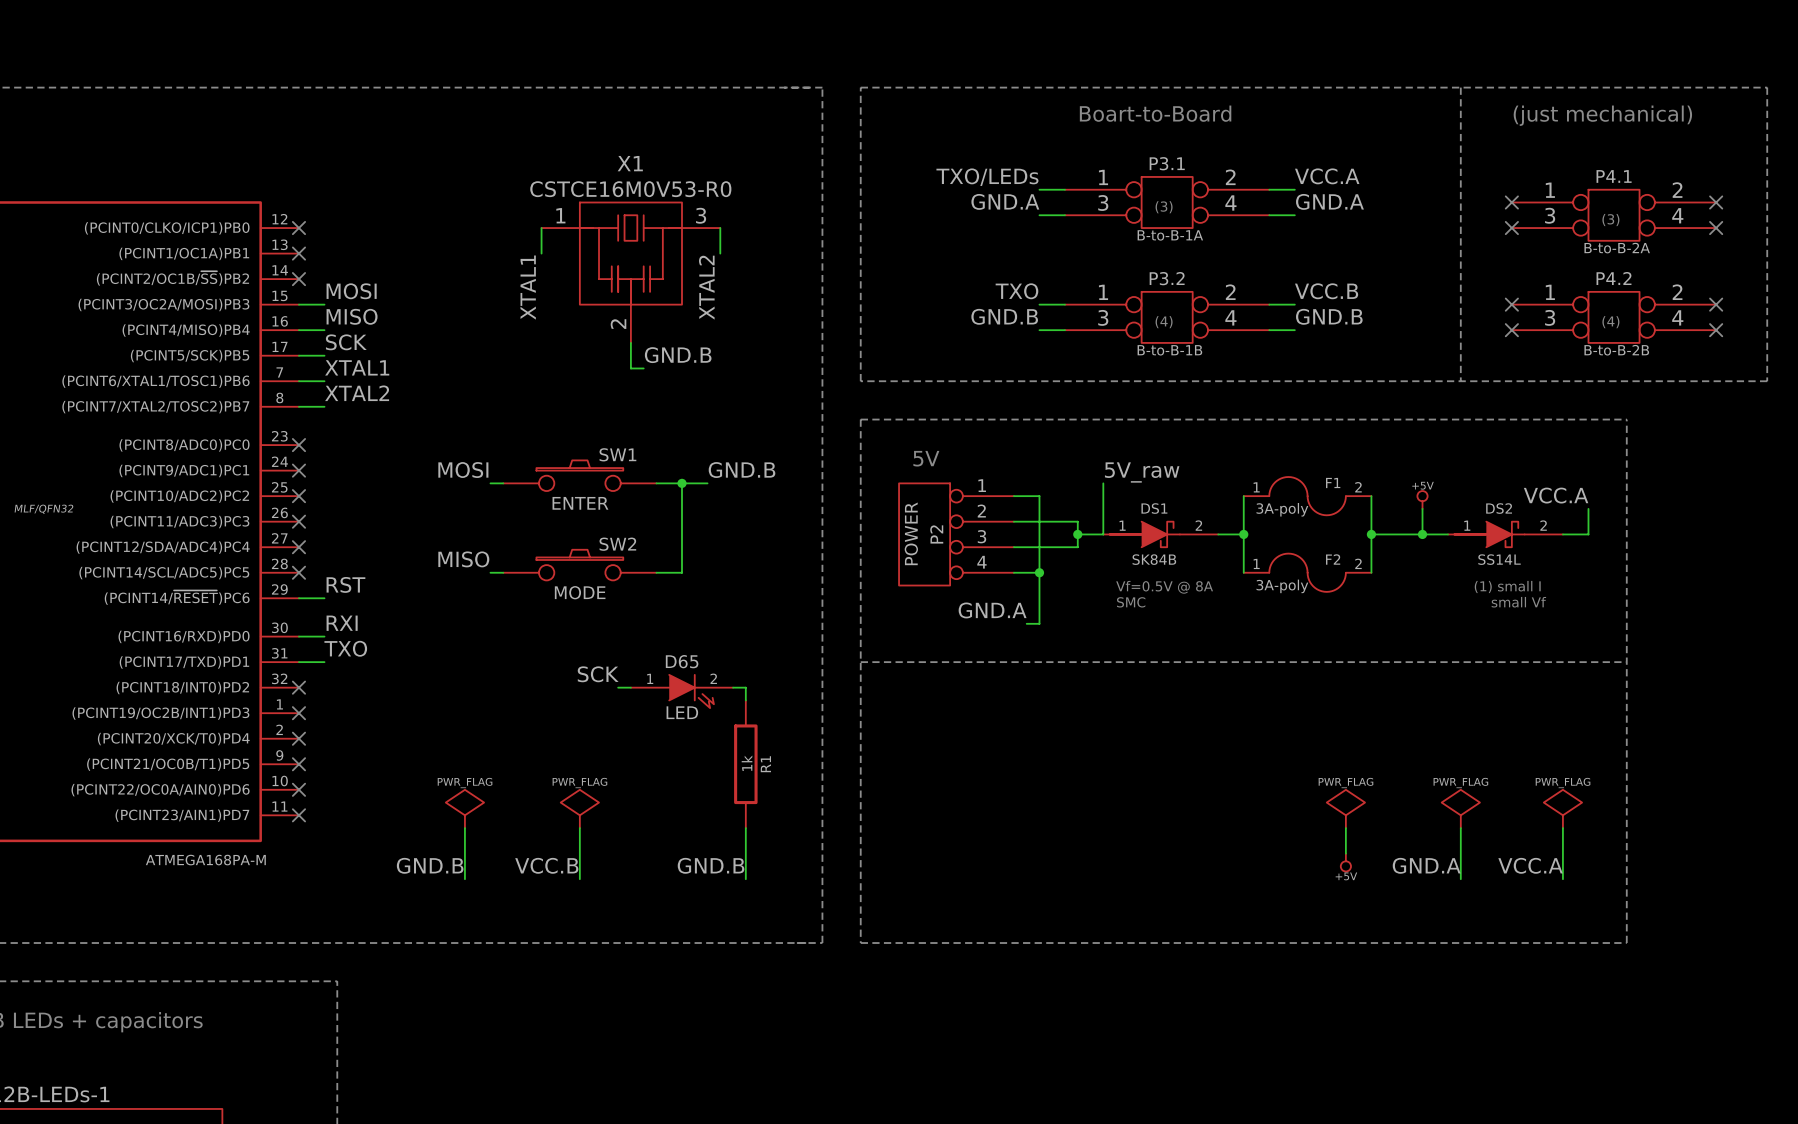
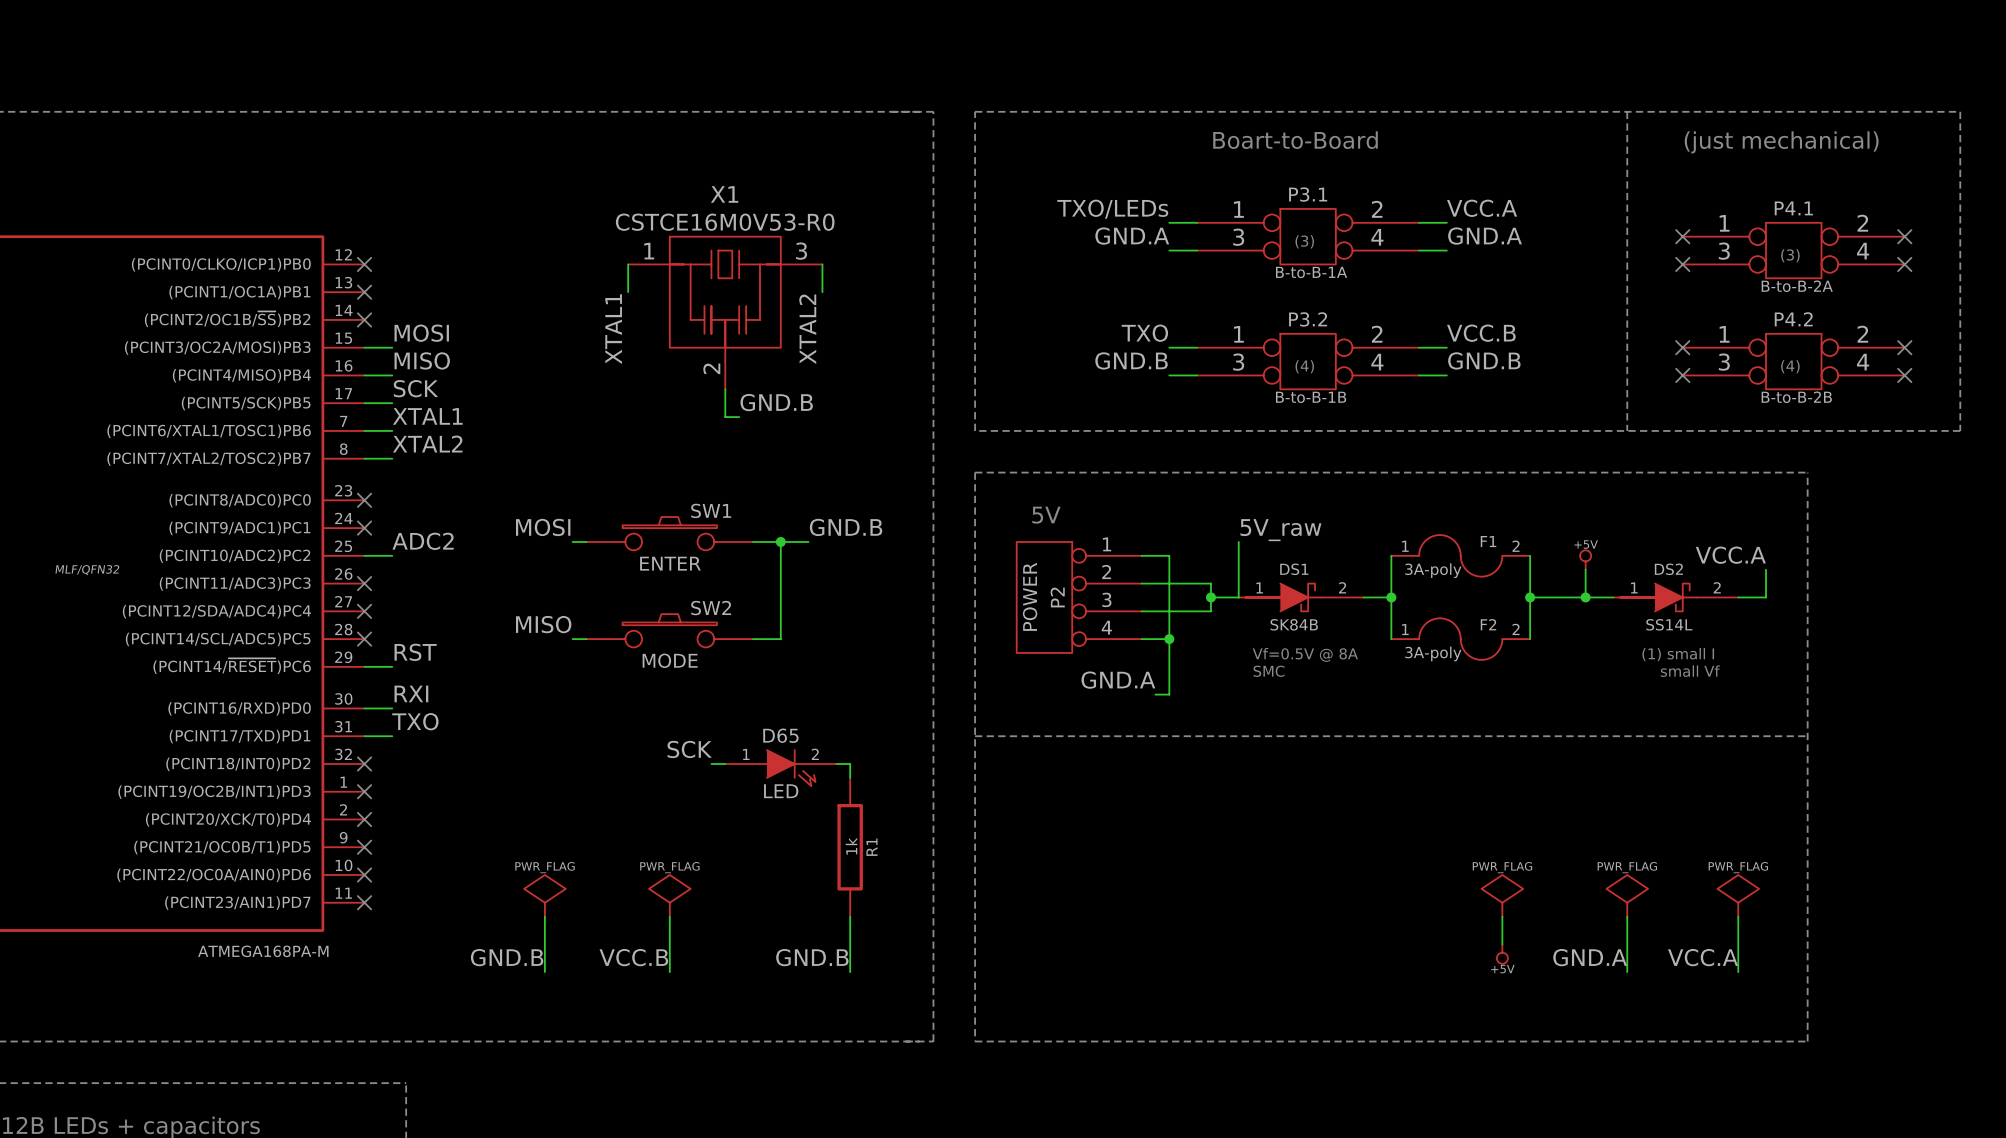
label: none -> ADC2 (423, 541)
wire: none -> (364, 555) (392, 555)
no-connect mark: (298, 496) -> none

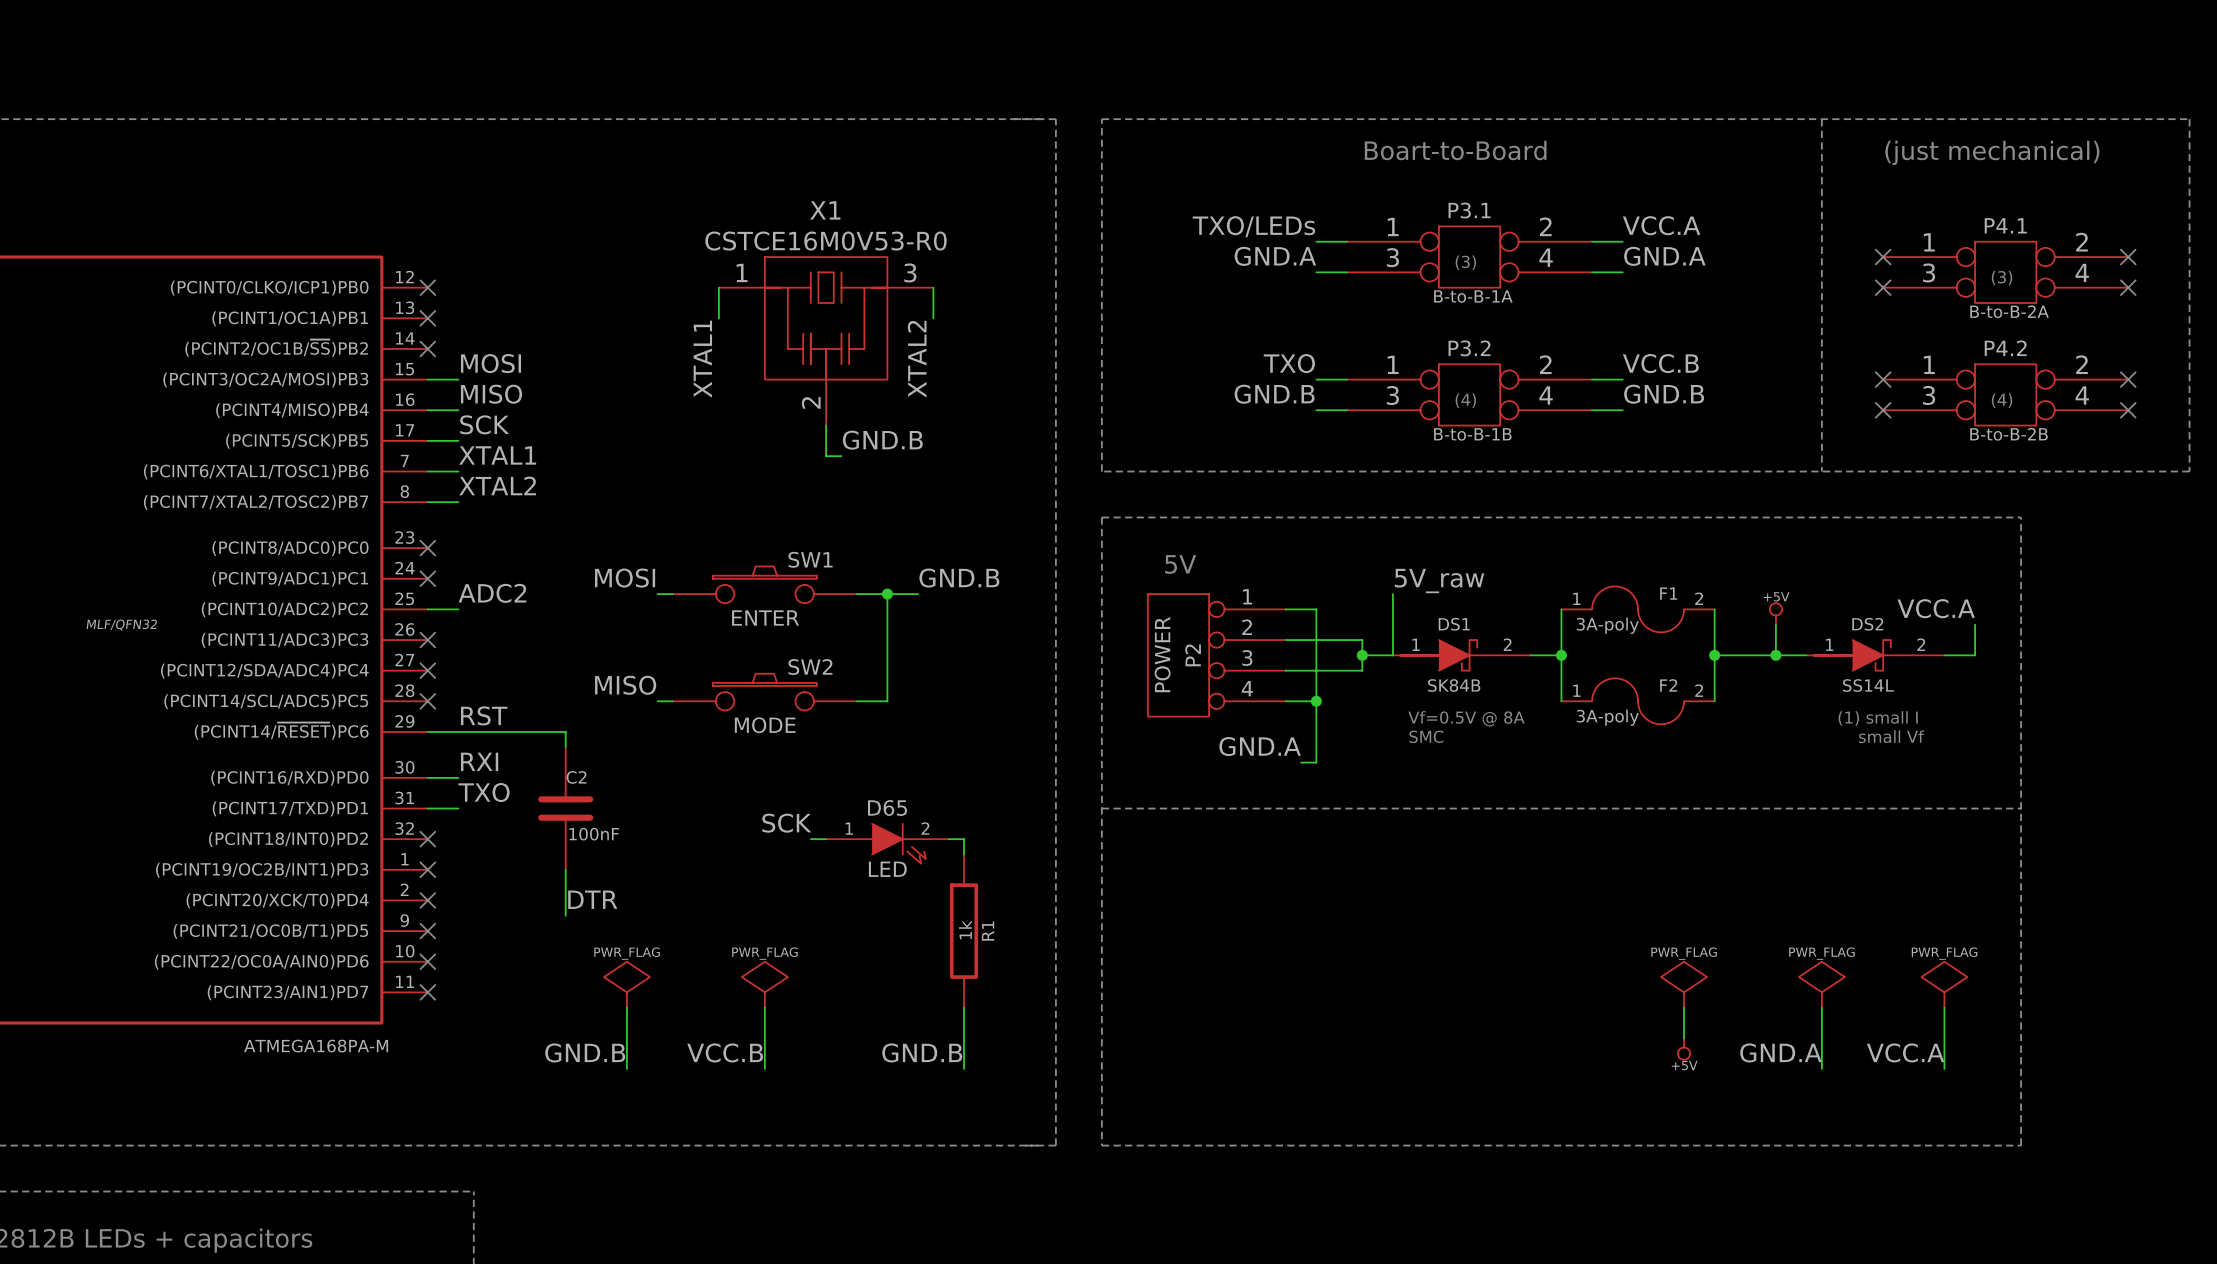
wire: none -> (458, 731) (565, 731) (565, 747)
C2: none -> 100nF (565, 808)
wire: none -> (565, 869) (565, 915)
label: none -> DTR (592, 899)

